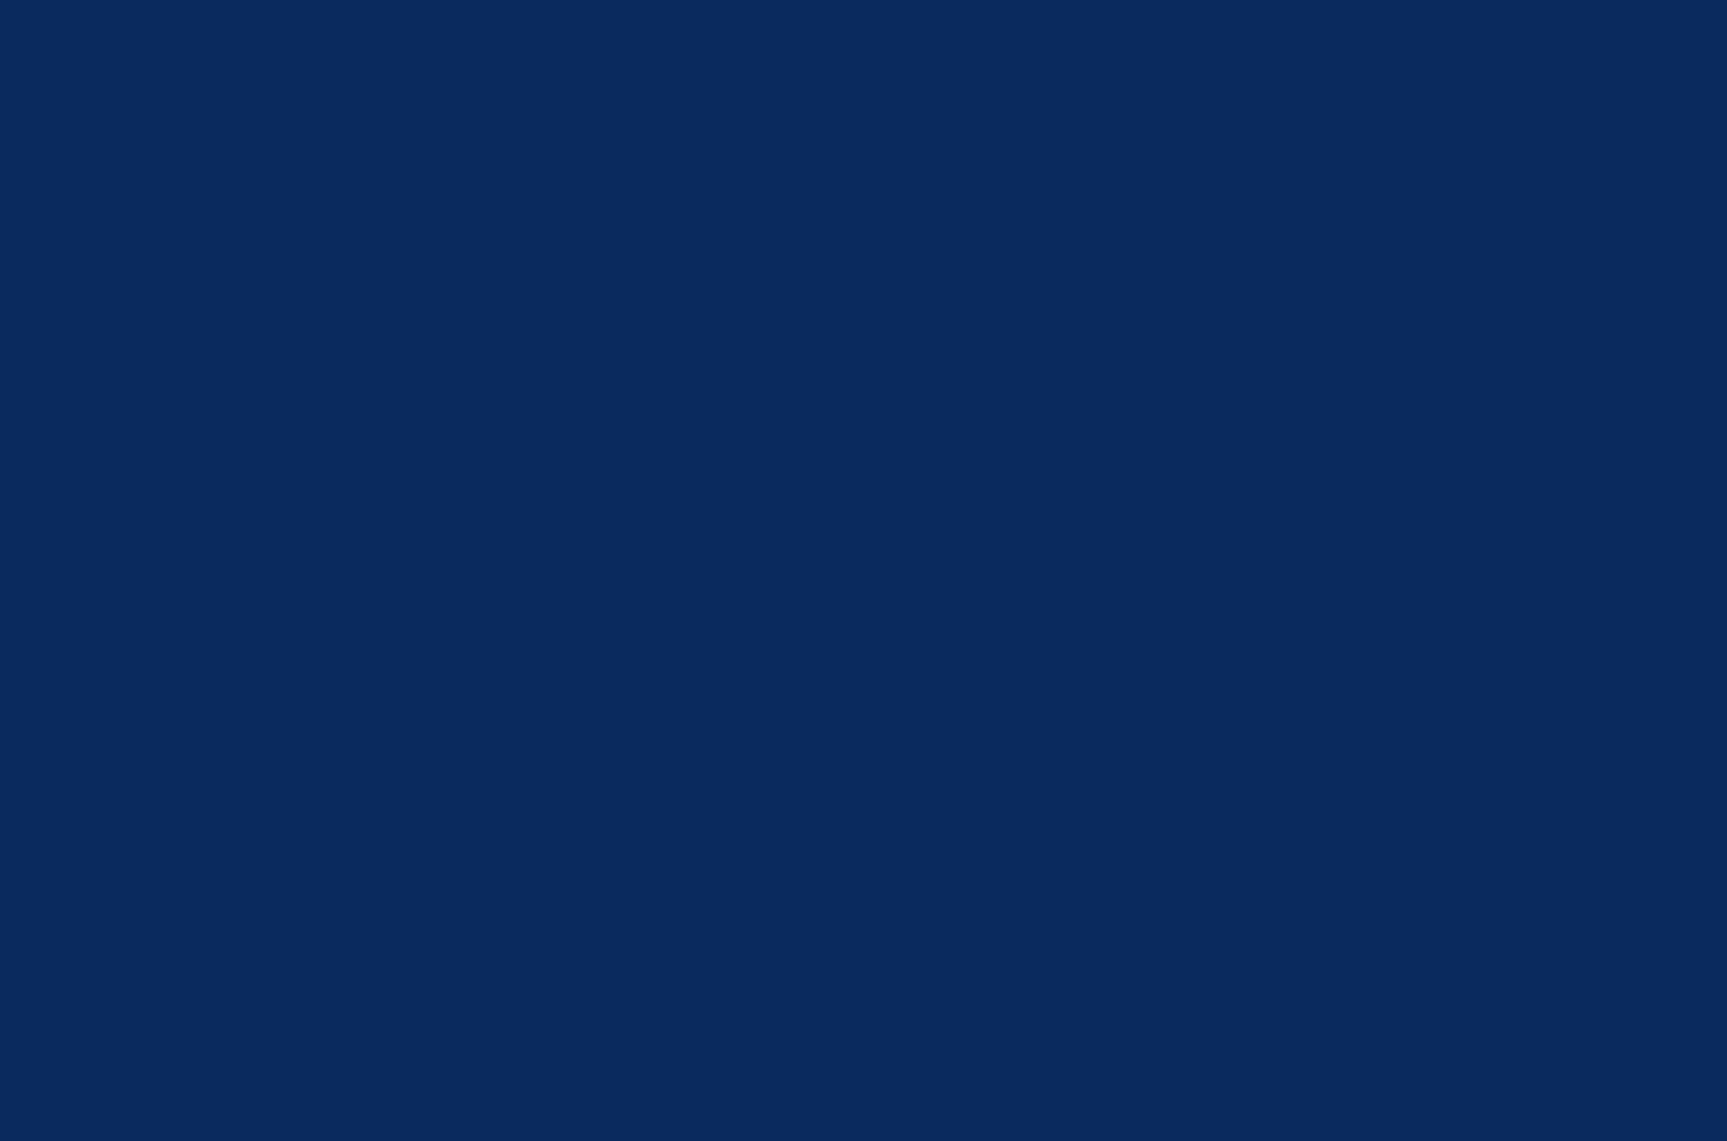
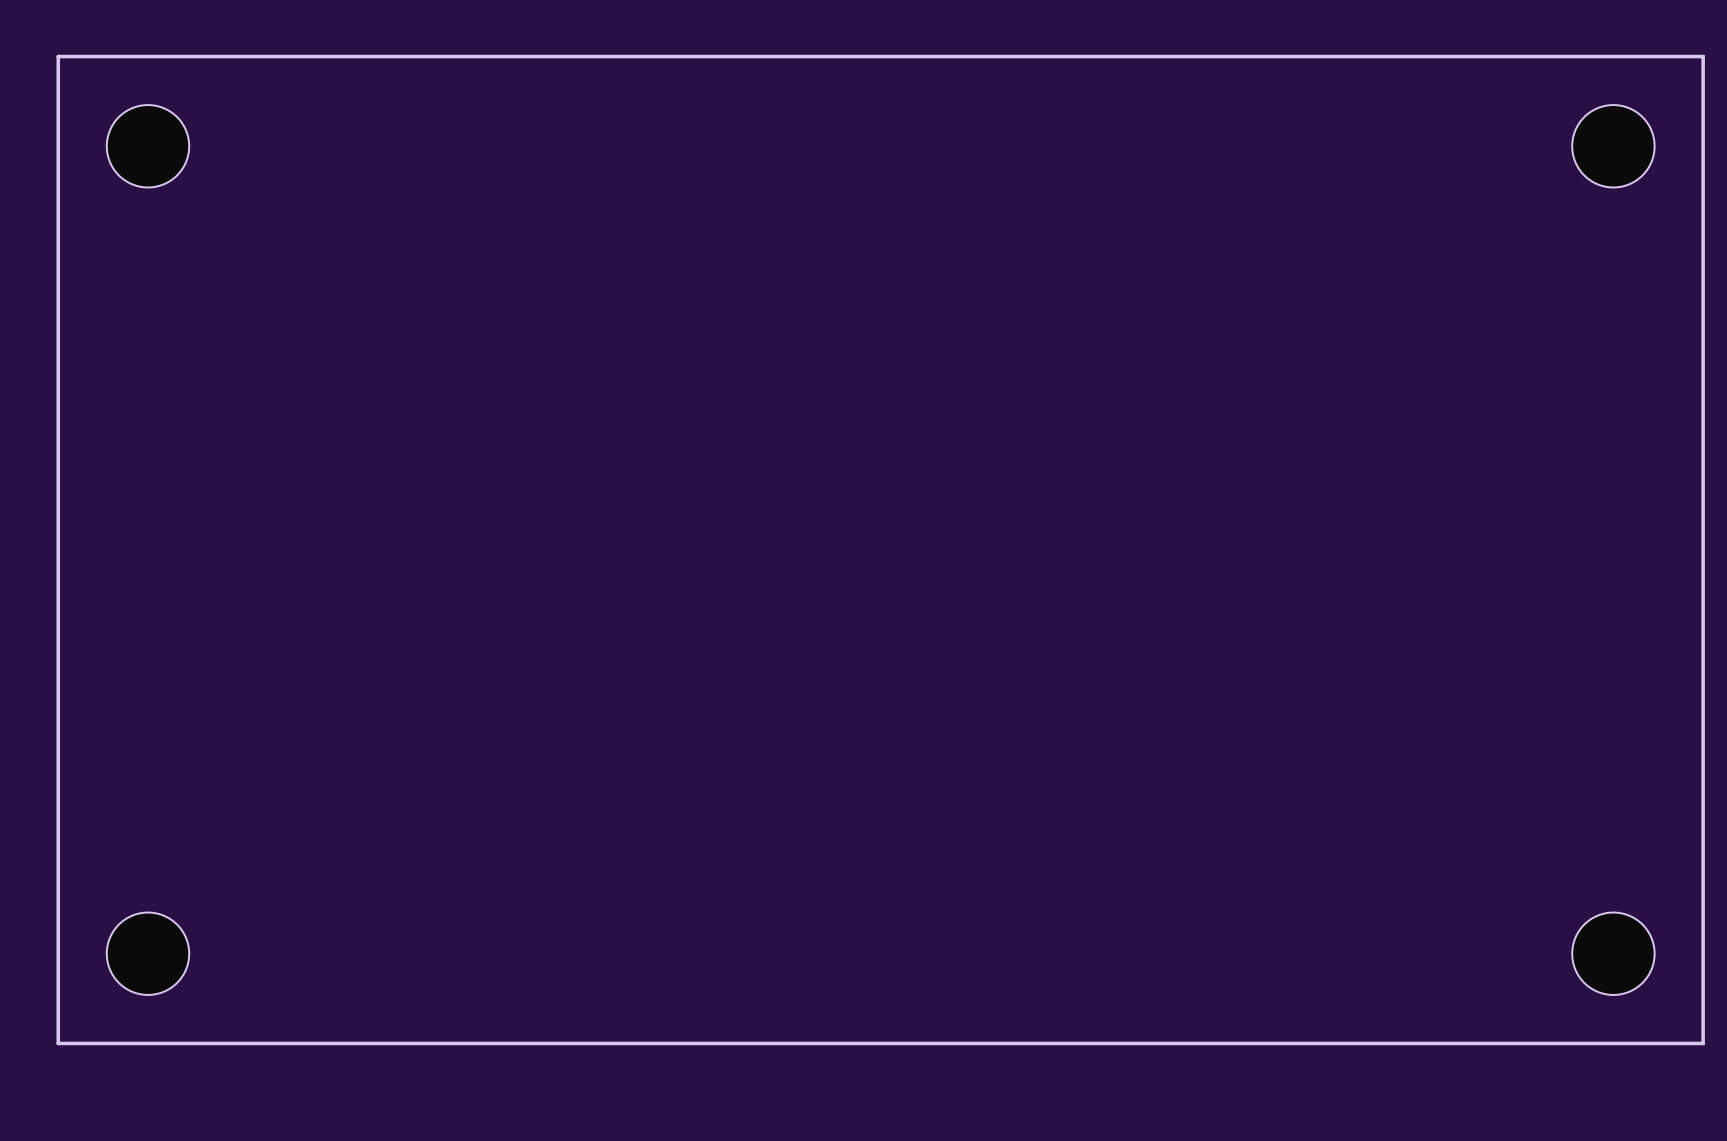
board edge: none -> (1703, 56) (1703, 1043) (58, 1043) (58, 56) (1703, 56)
part: none -> (147, 146)
part: none -> (1613, 146)
part: none -> (147, 953)
part: none -> (1613, 953)

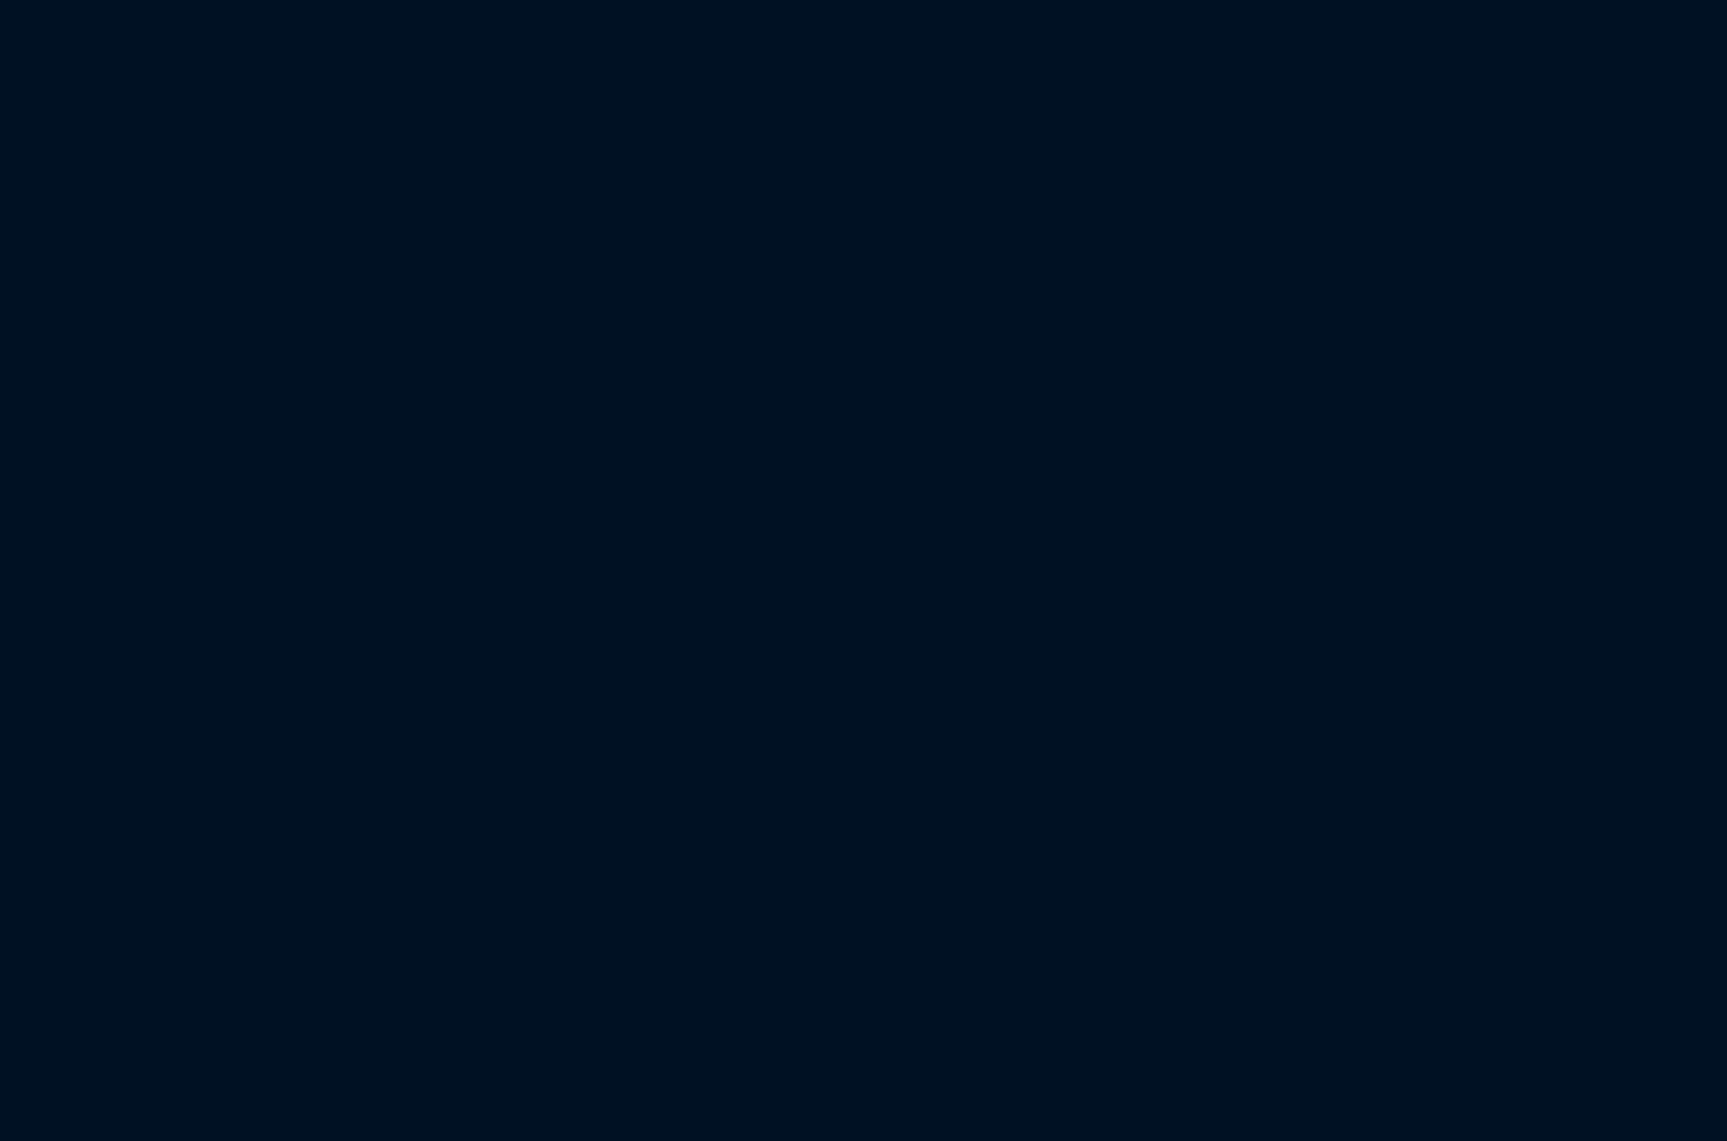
board edge: (1703, 56) (1703, 1043) (58, 1043) (58, 56) (1703, 56) -> none
part: (147, 146) -> none
part: (1613, 146) -> none
part: (147, 953) -> none
part: (1613, 953) -> none

